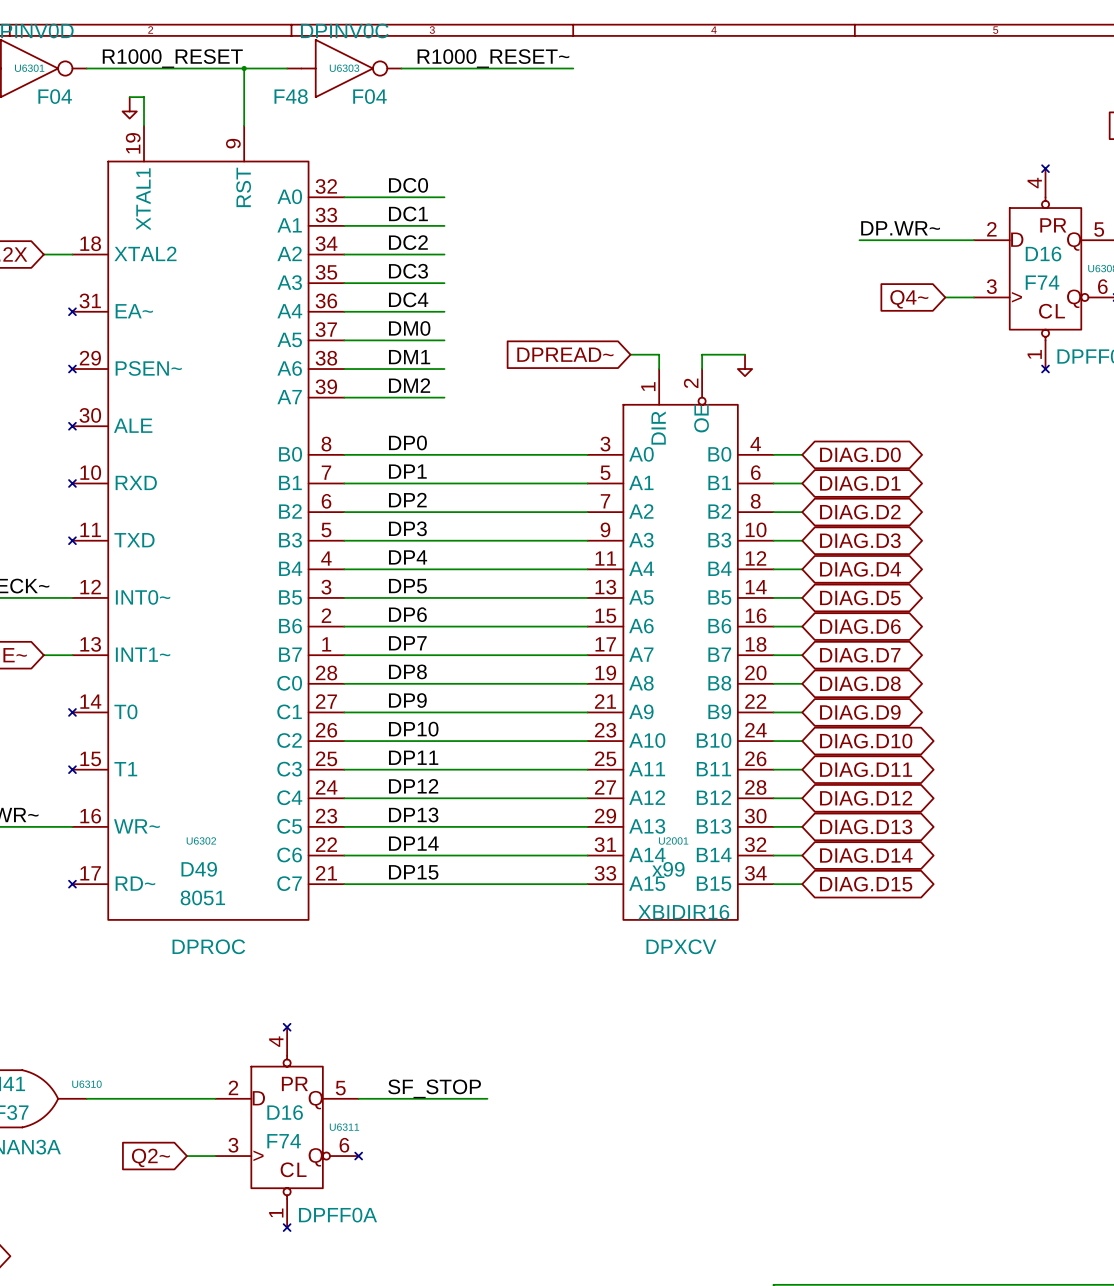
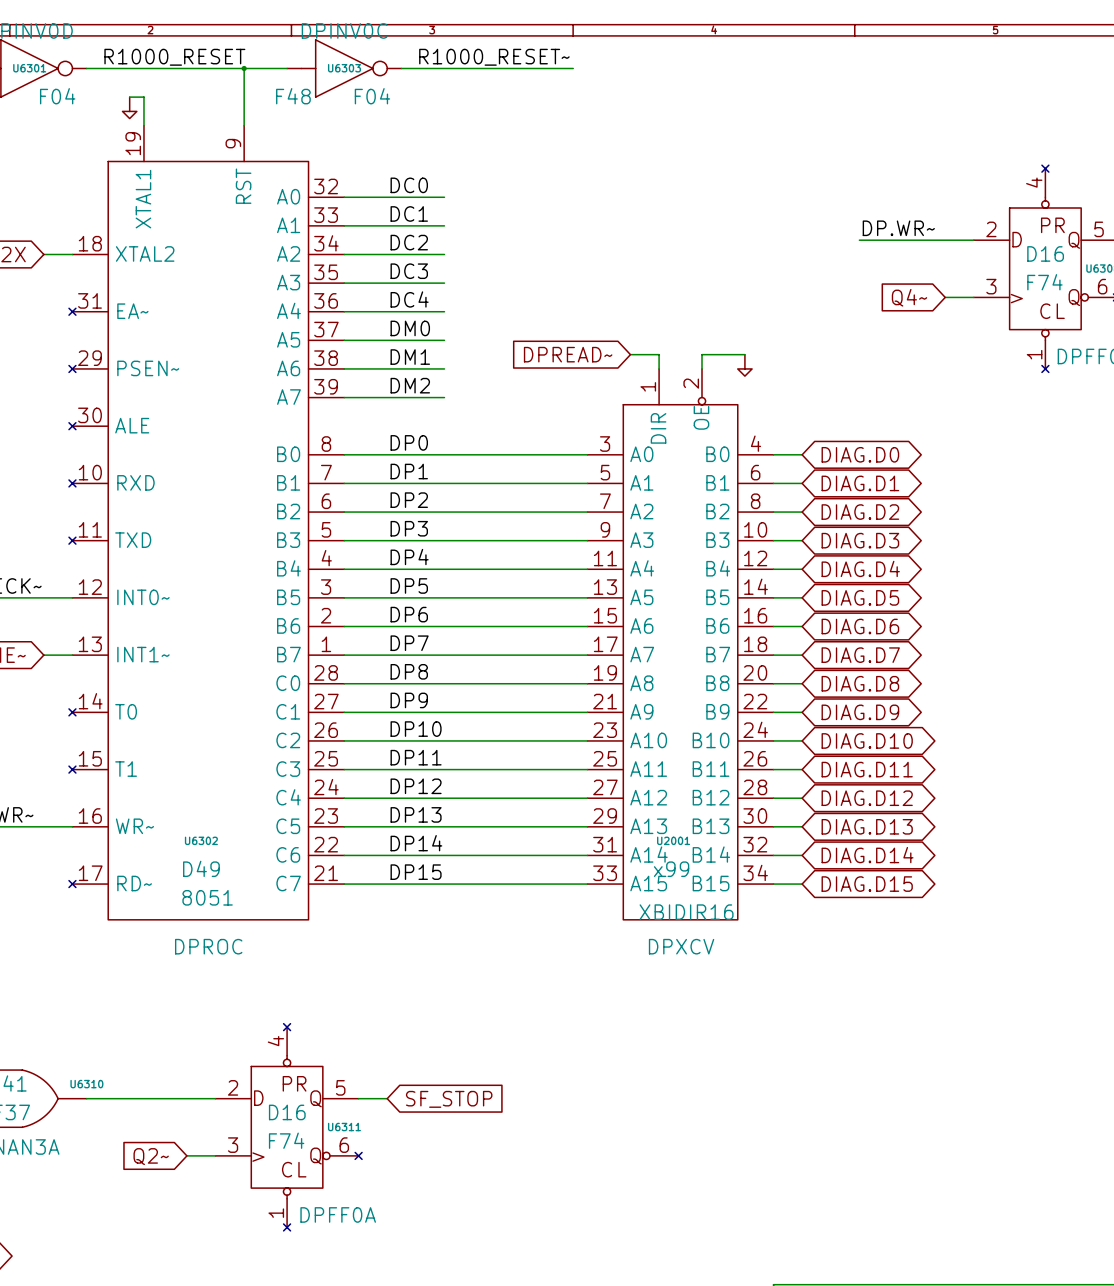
label: SF_STOP (434, 1088) -> none
wire: (387, 1098) (487, 1098) -> none
global label: none -> SF_STOP (449, 1099)

